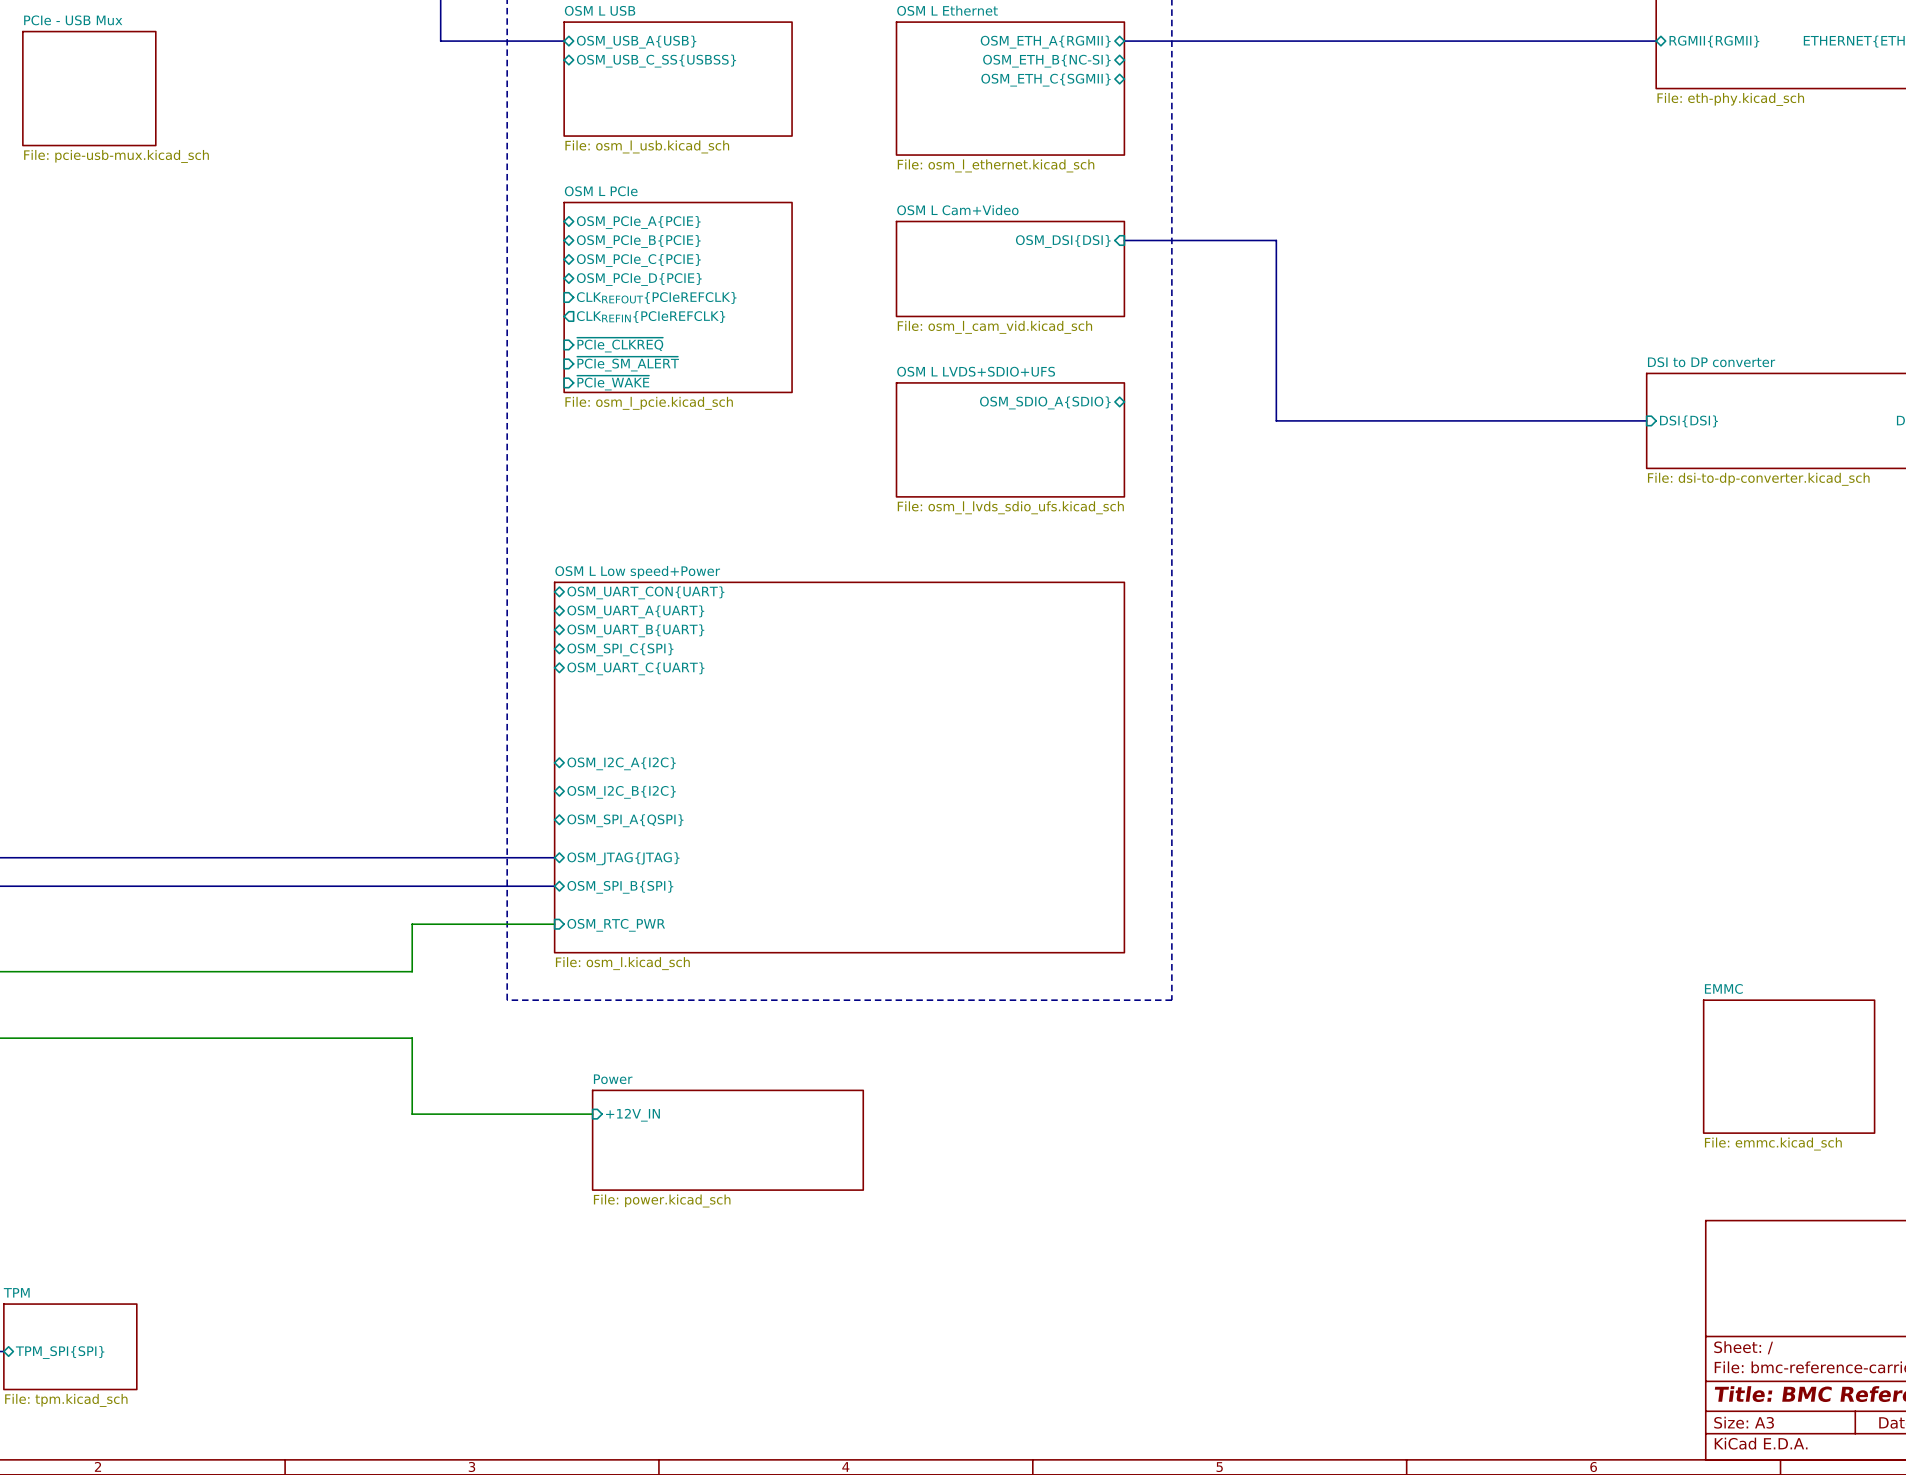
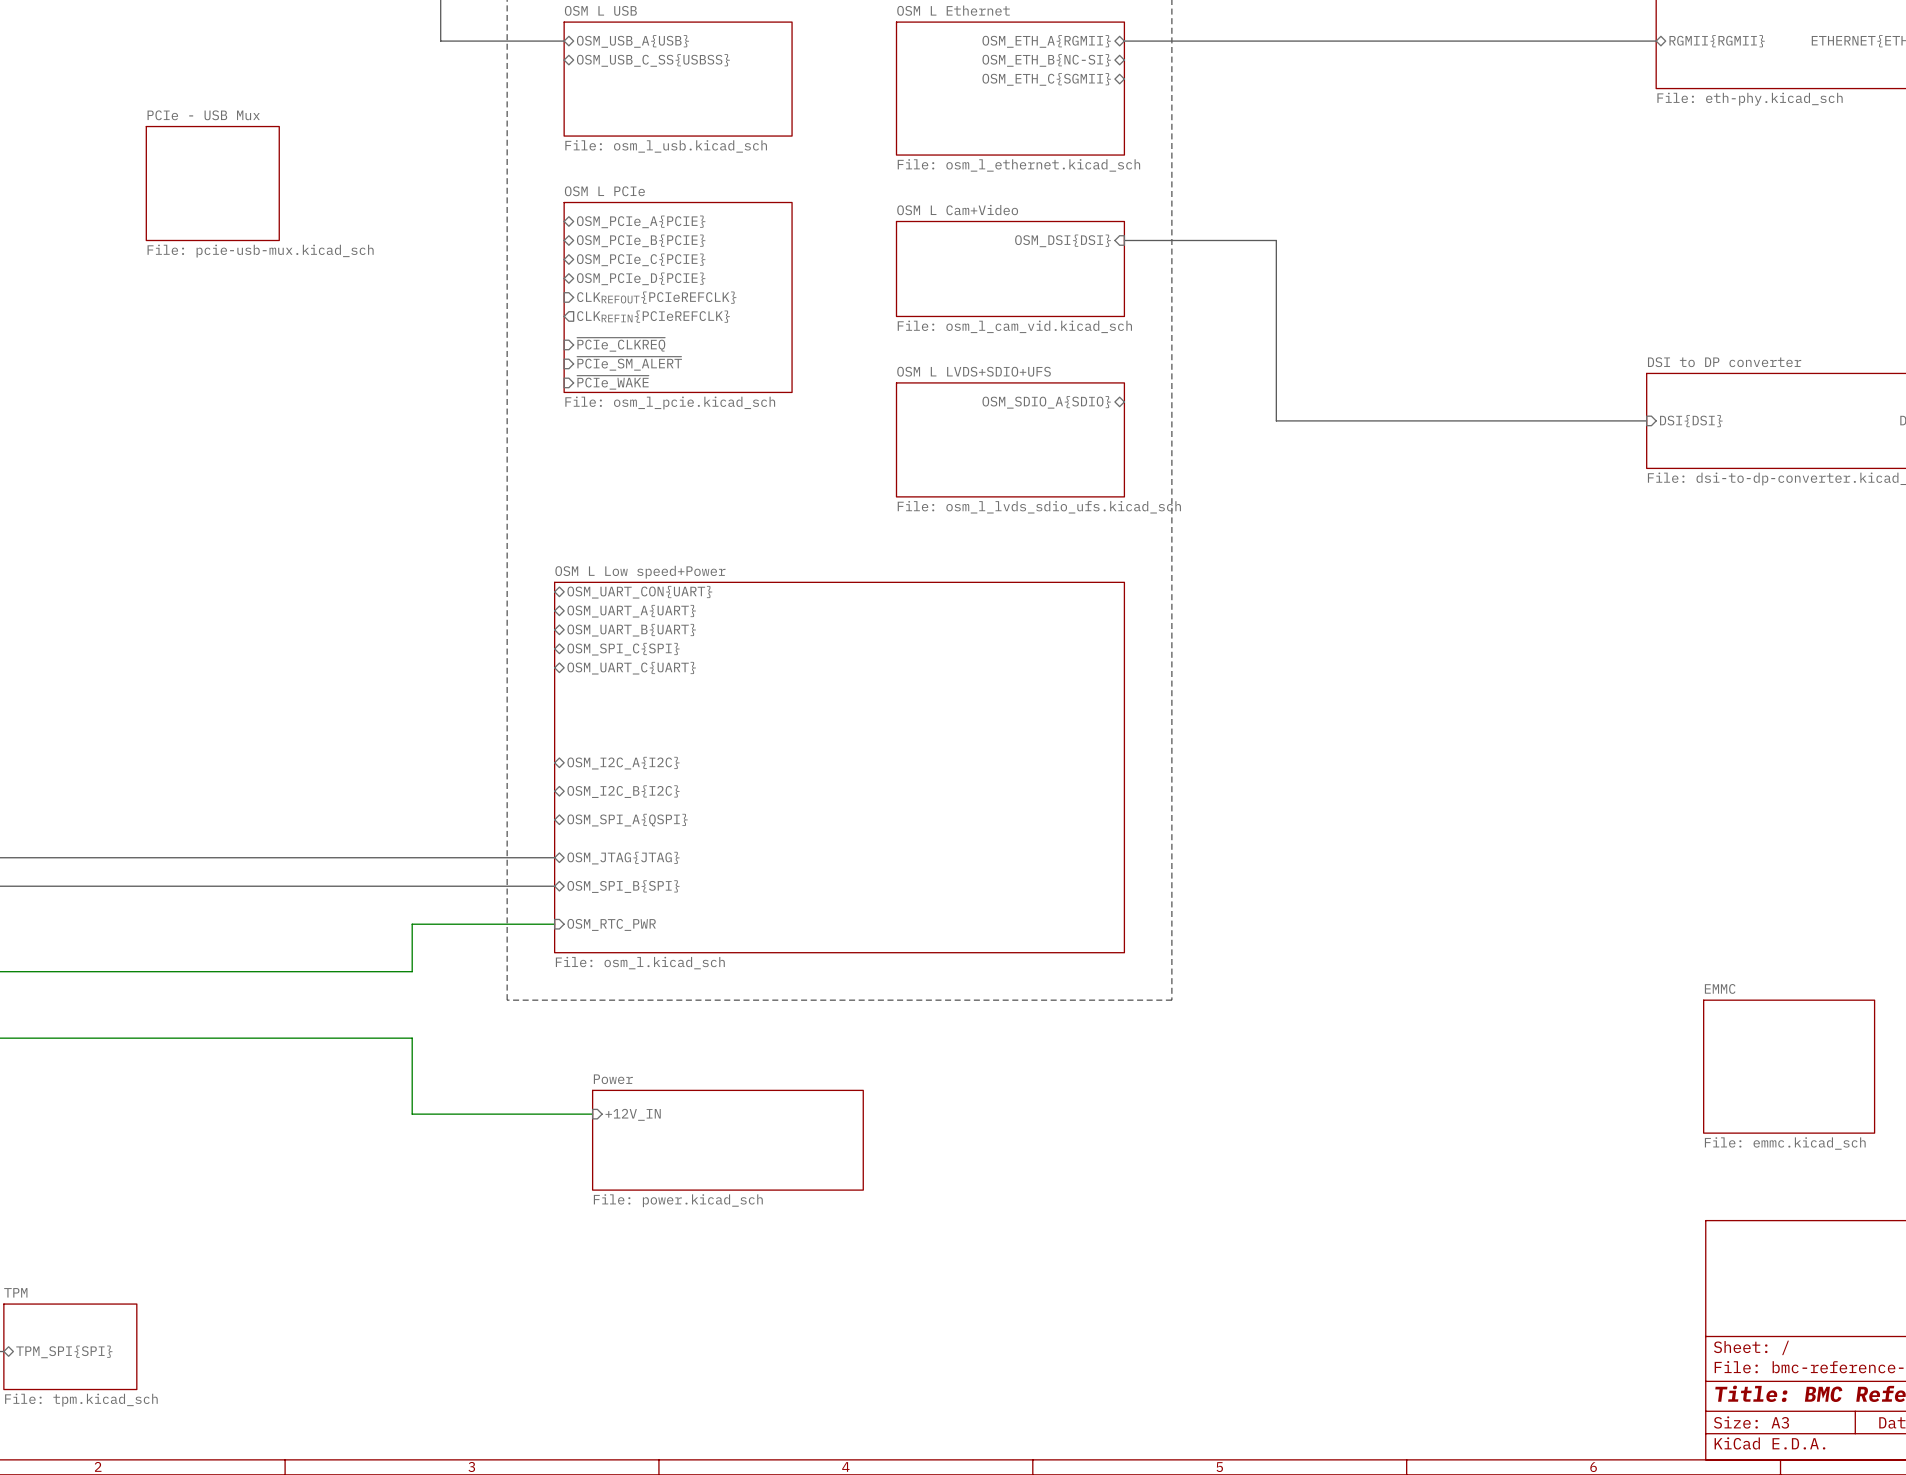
sheet PCIe - USB Mux position: (89, 88) -> (212, 183)

